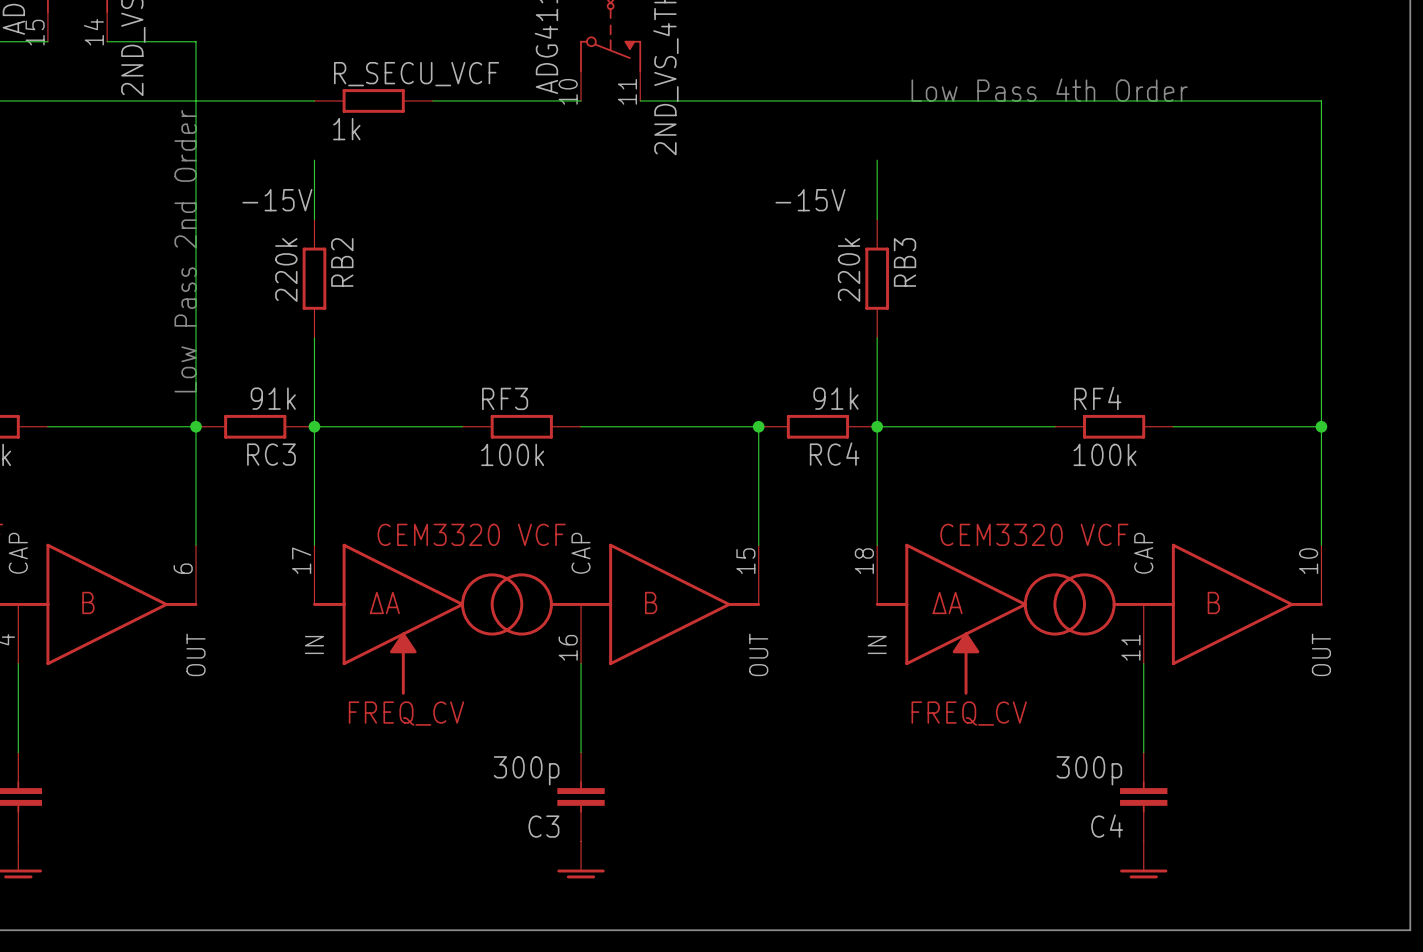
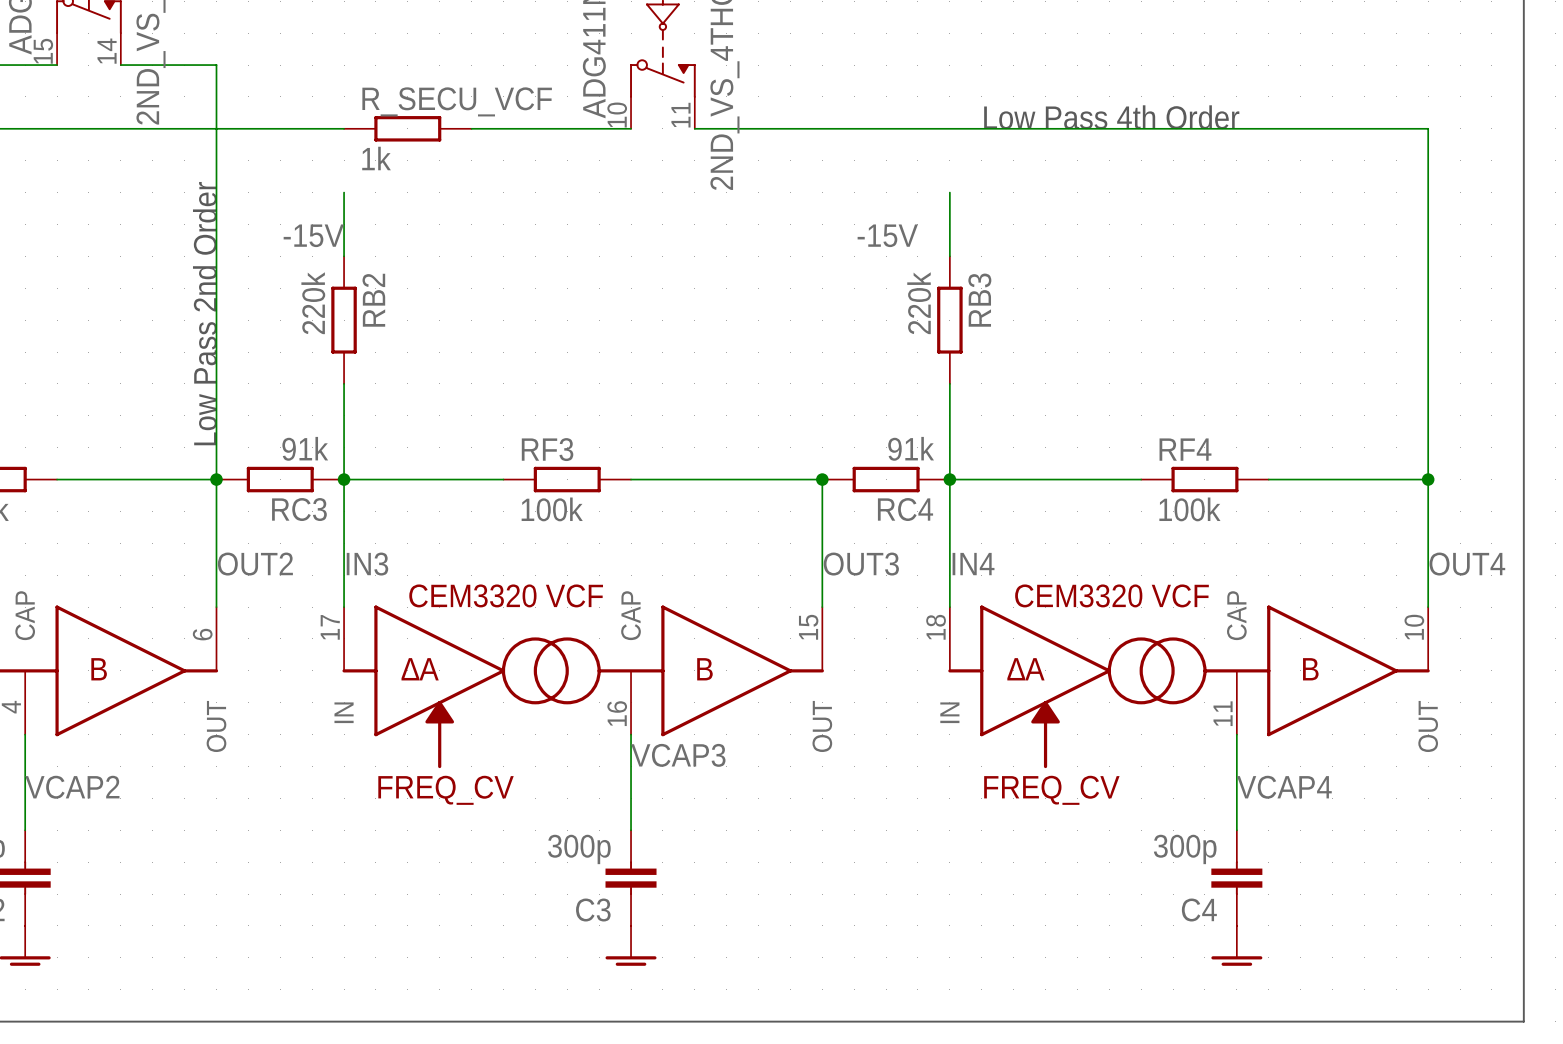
label: none -> IN4 (973, 564)
label: none -> OUT4 (1467, 564)
label: none -> OUT2 (255, 564)
label: none -> IN3 (367, 564)
label: none -> OUT3 (861, 564)
label: none -> VCAP3 (678, 755)
label: none -> VCAP2 (72, 787)
label: none -> VCAP4 (1284, 787)

